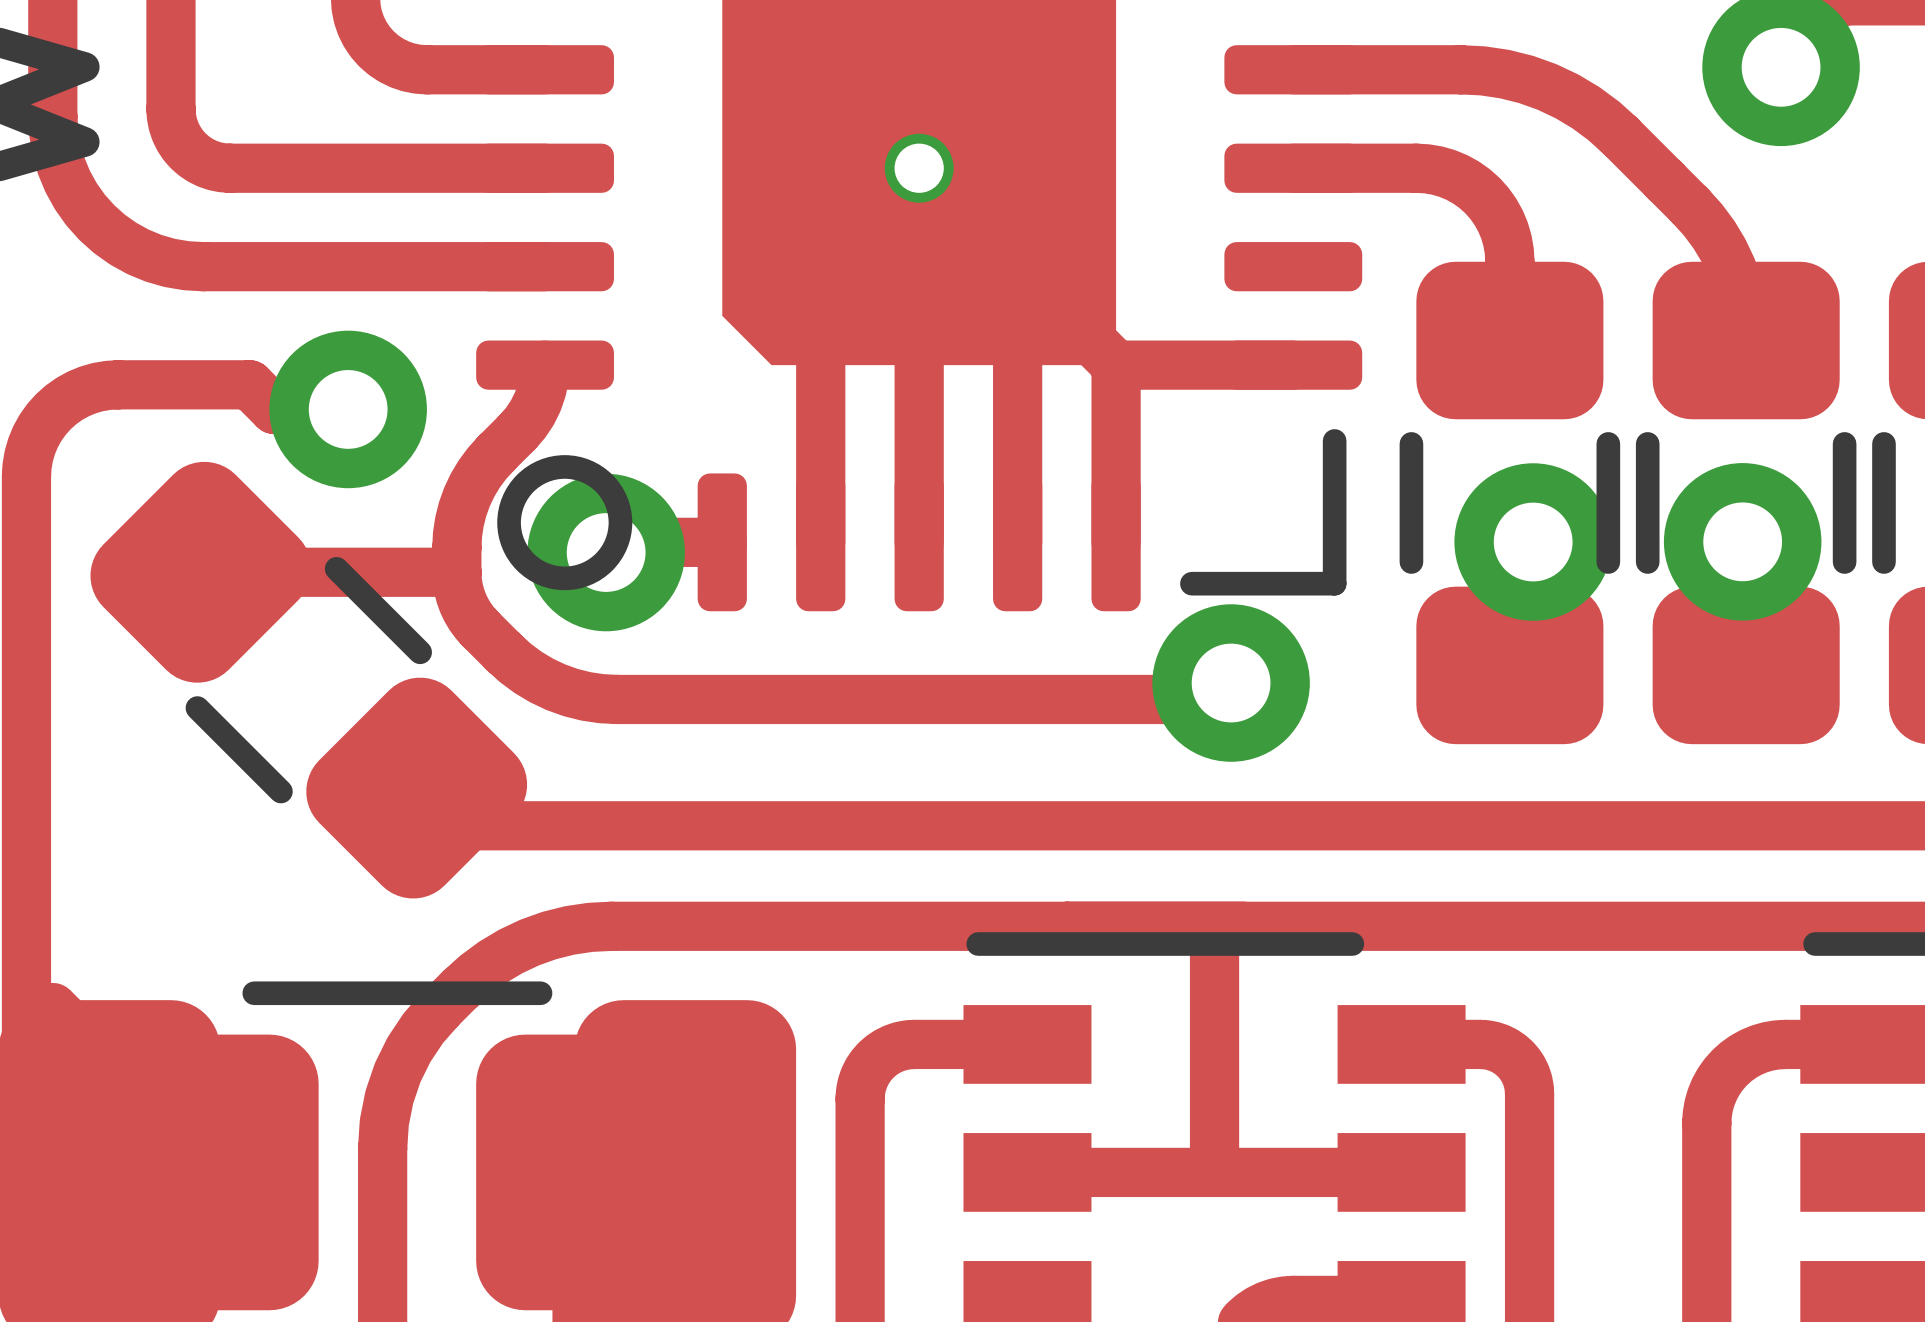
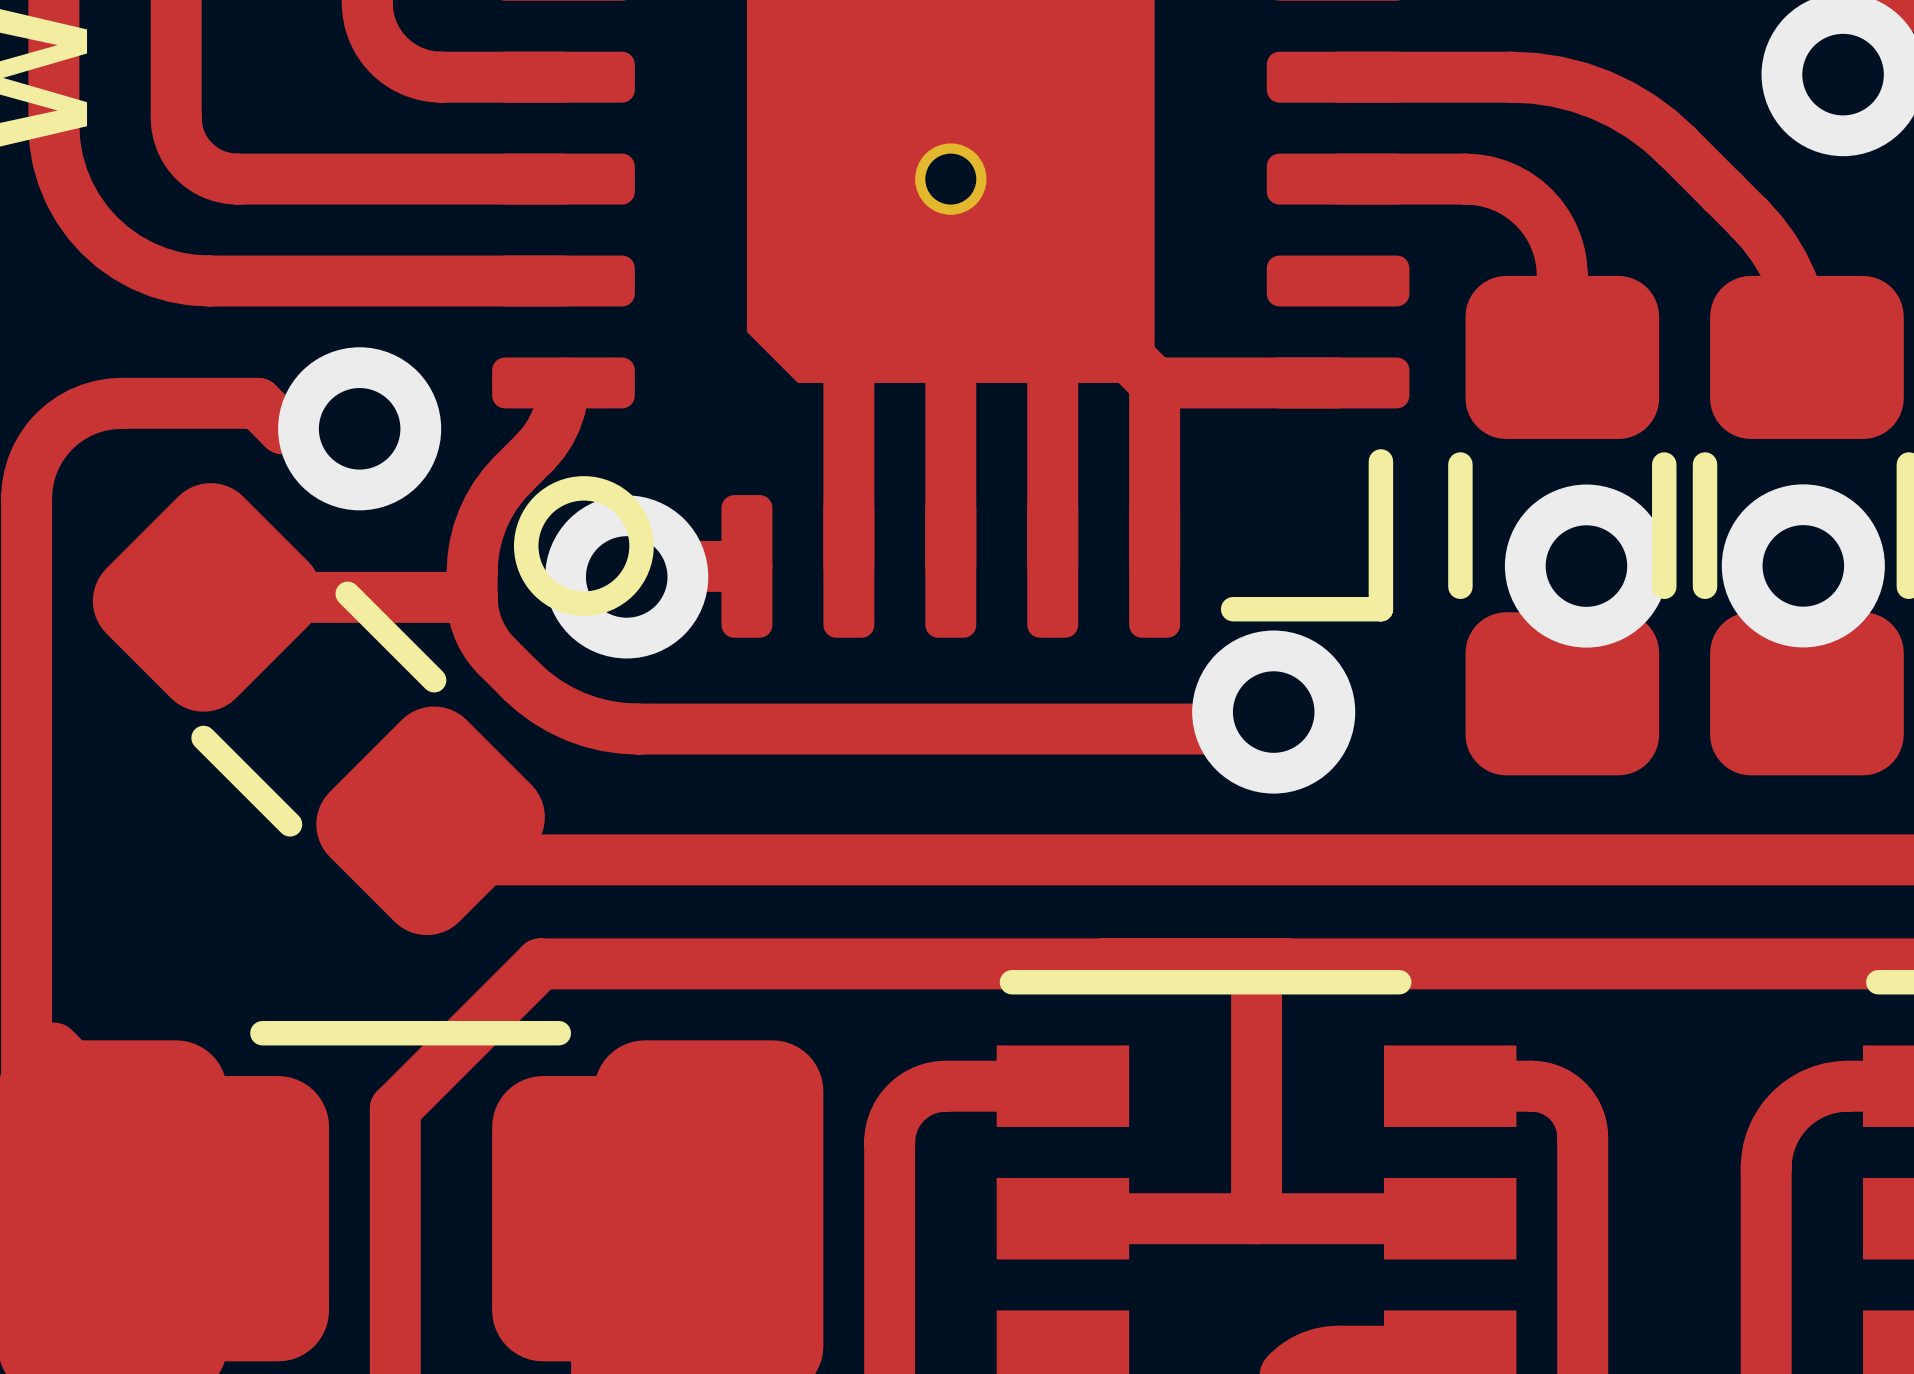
track: (611, 926) (569, 930) (529, 942) (492, 962) (460, 988) -> (632, 963) (540, 963) (475, 1028)
track: (440, 1008) (423, 1028) (409, 1049) (397, 1072) (389, 1097) (384, 1122) (382, 1148) -> (455, 1049) (395, 1109) (395, 1193)

